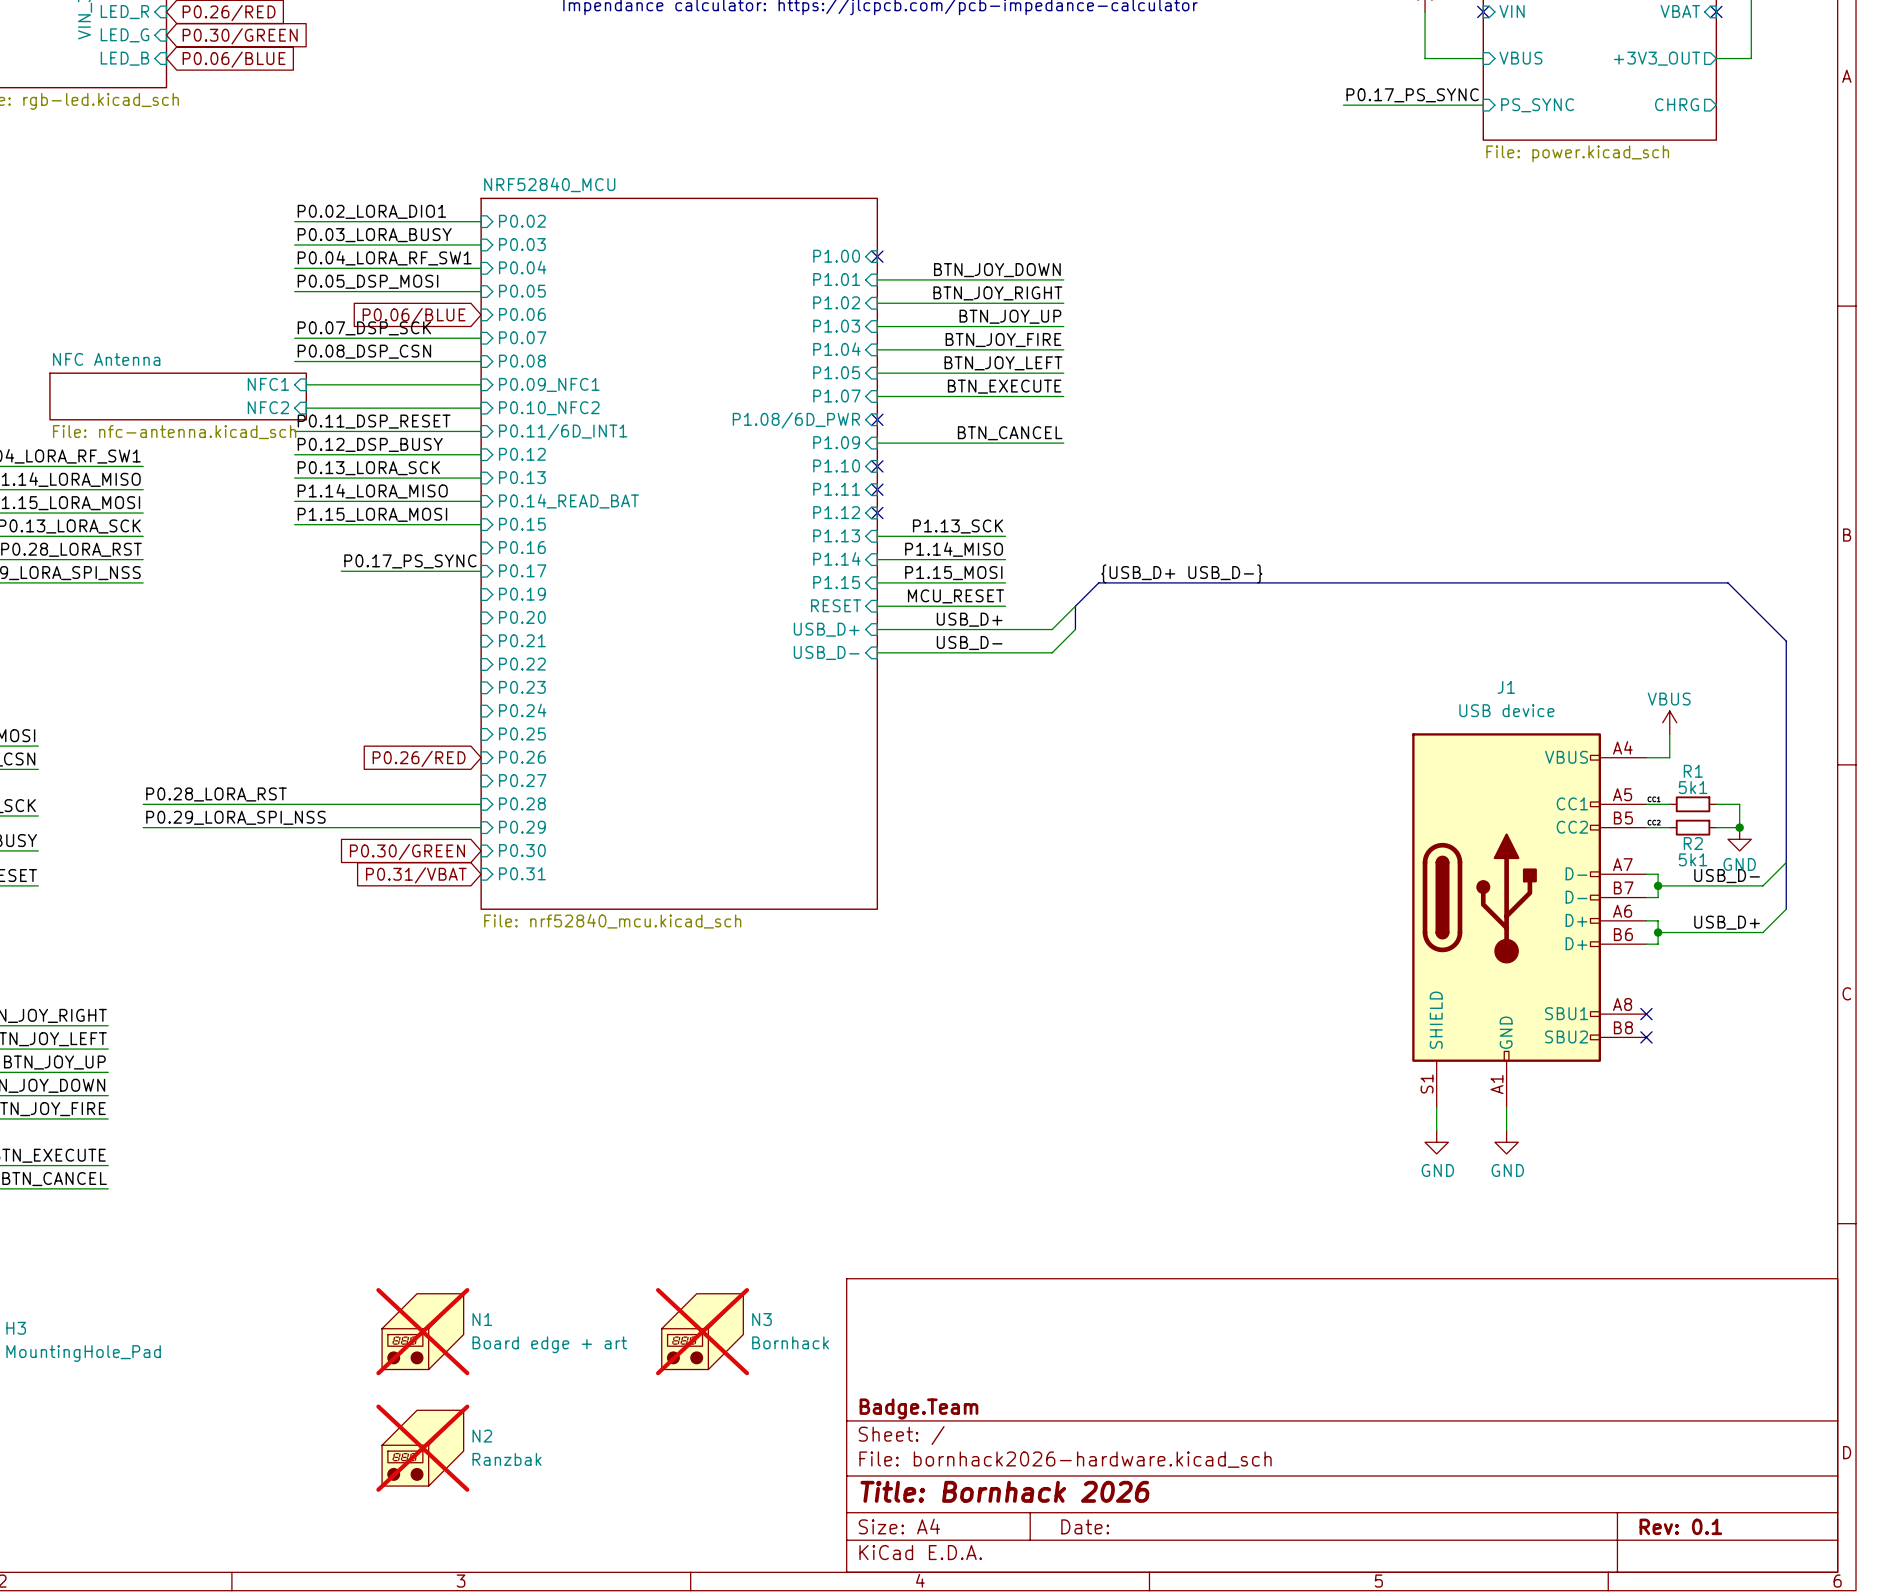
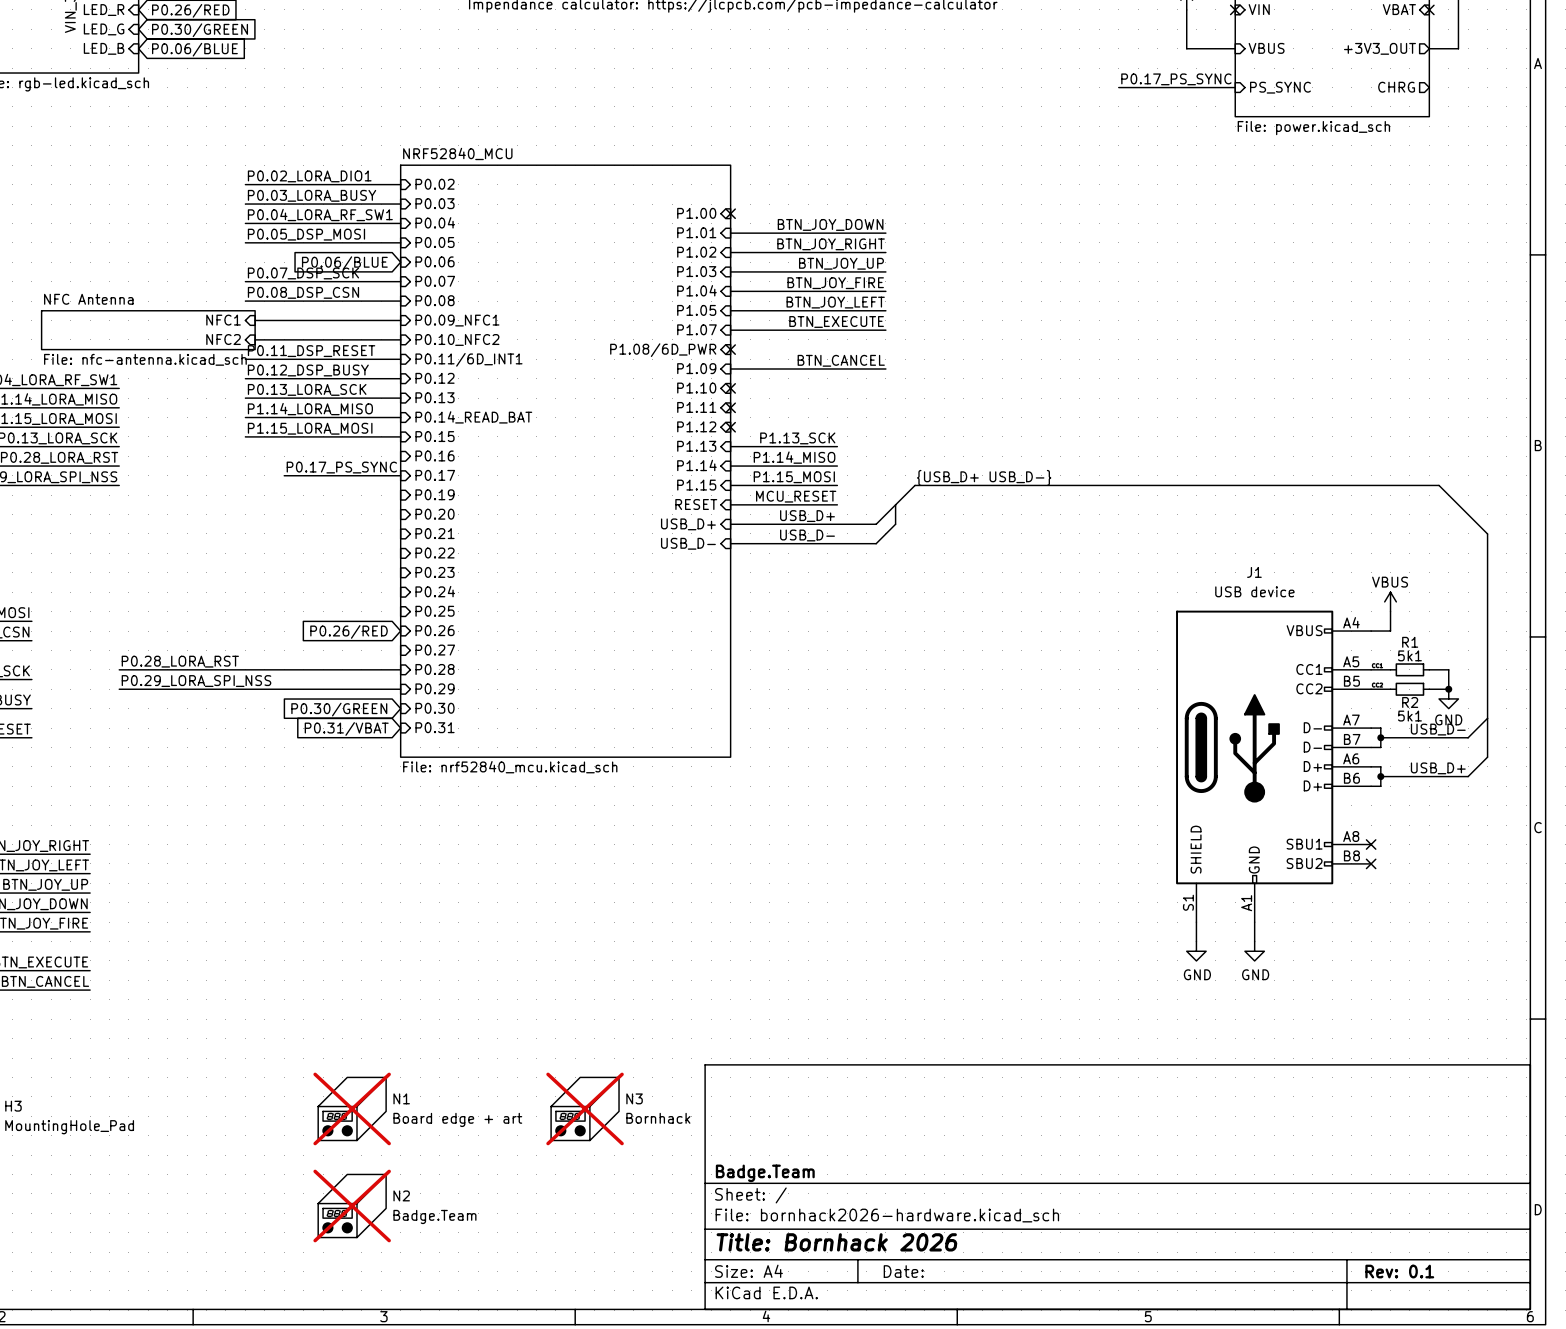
N2 value: Ranzbak (507, 1459) -> Badge.Team (434, 1216)

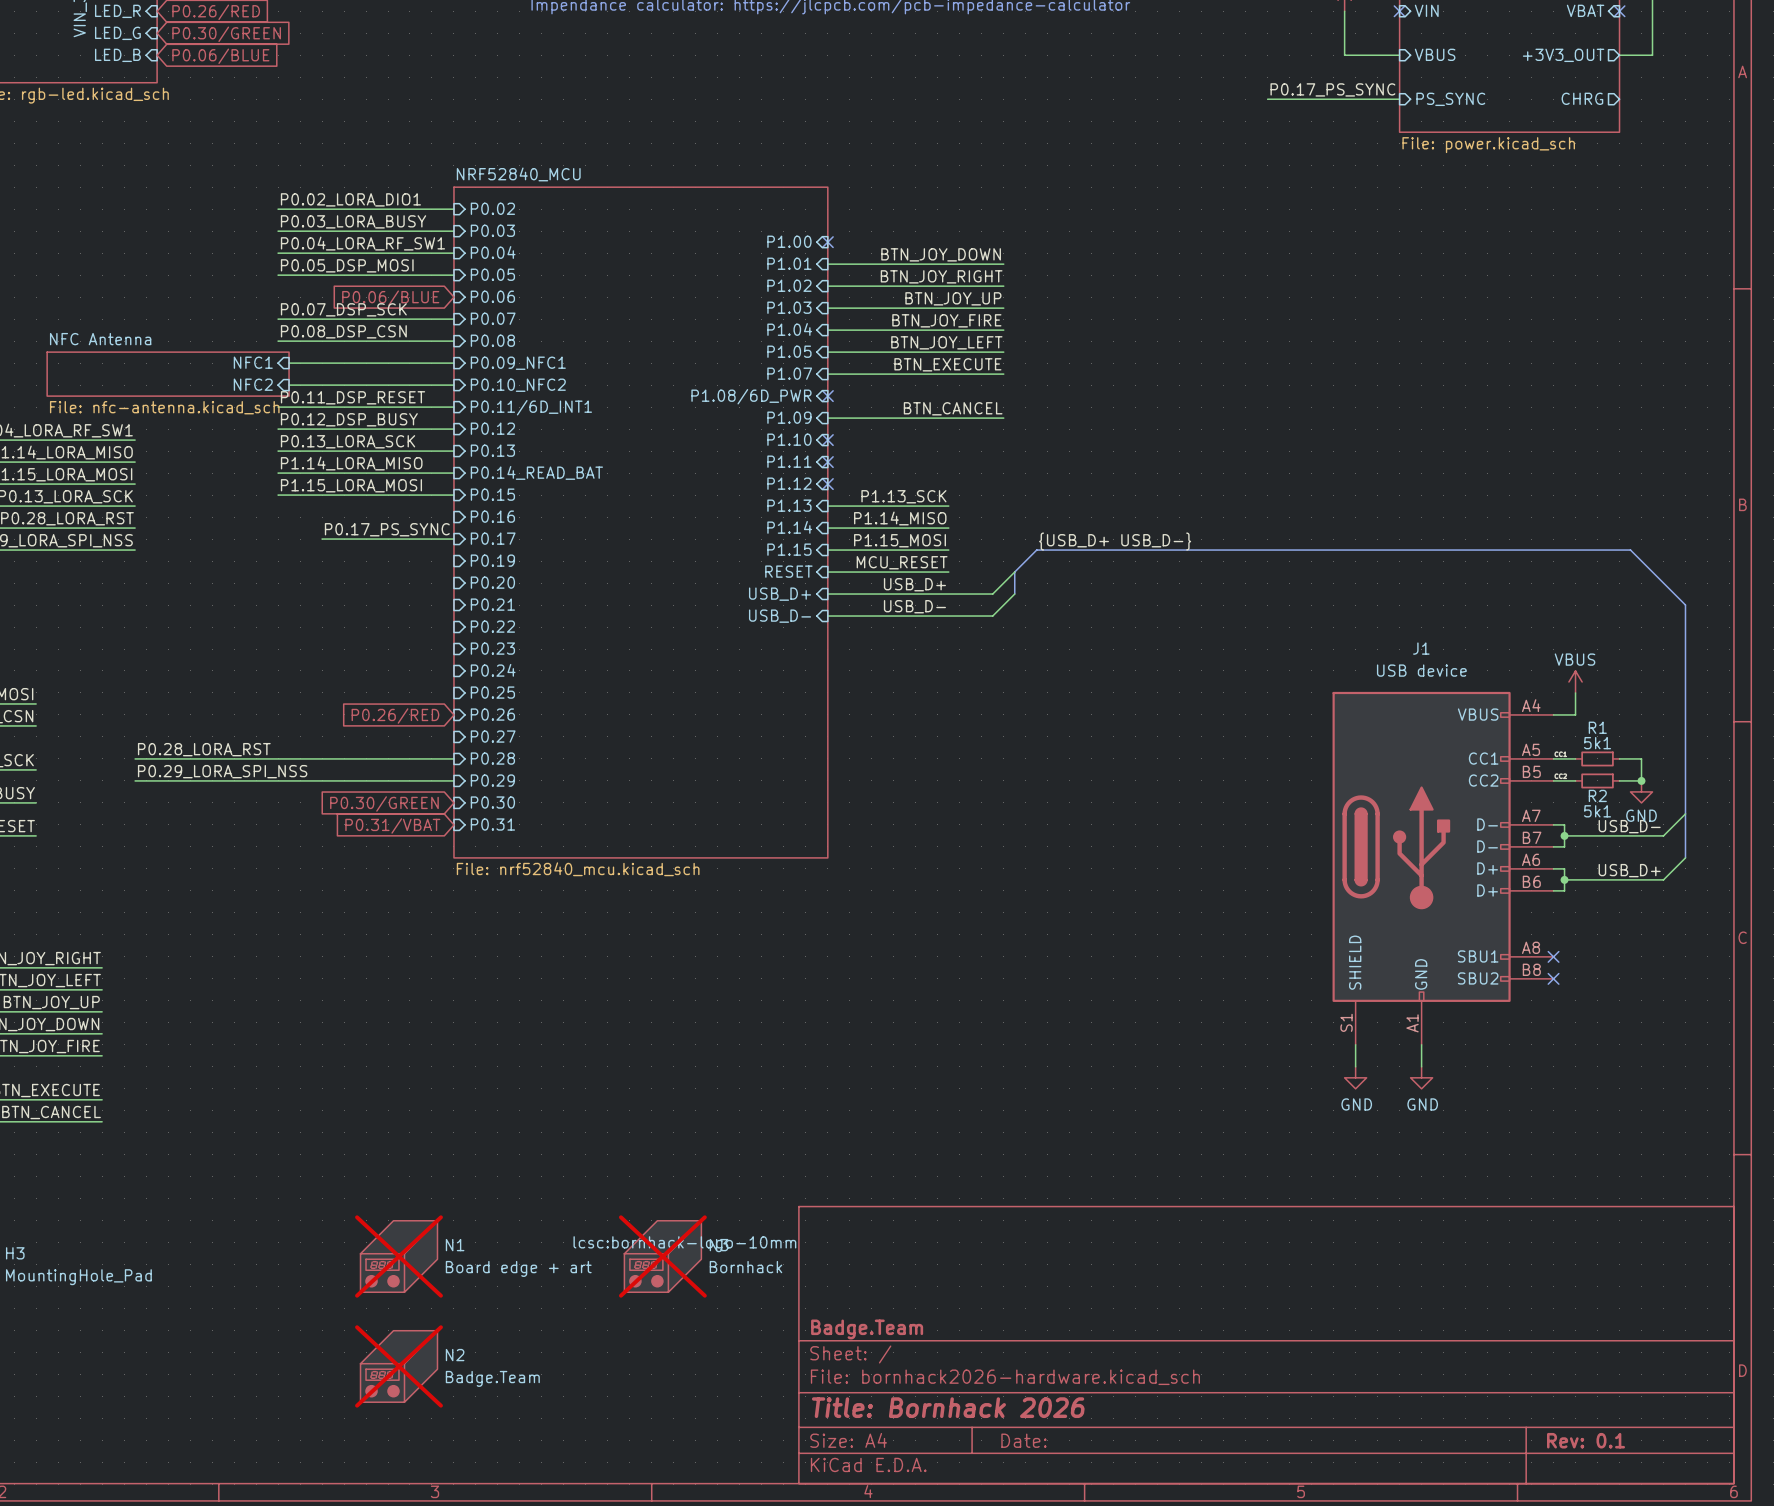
N3 text: none -> lcsc:bornhack-logo-10mm (684, 1244)

